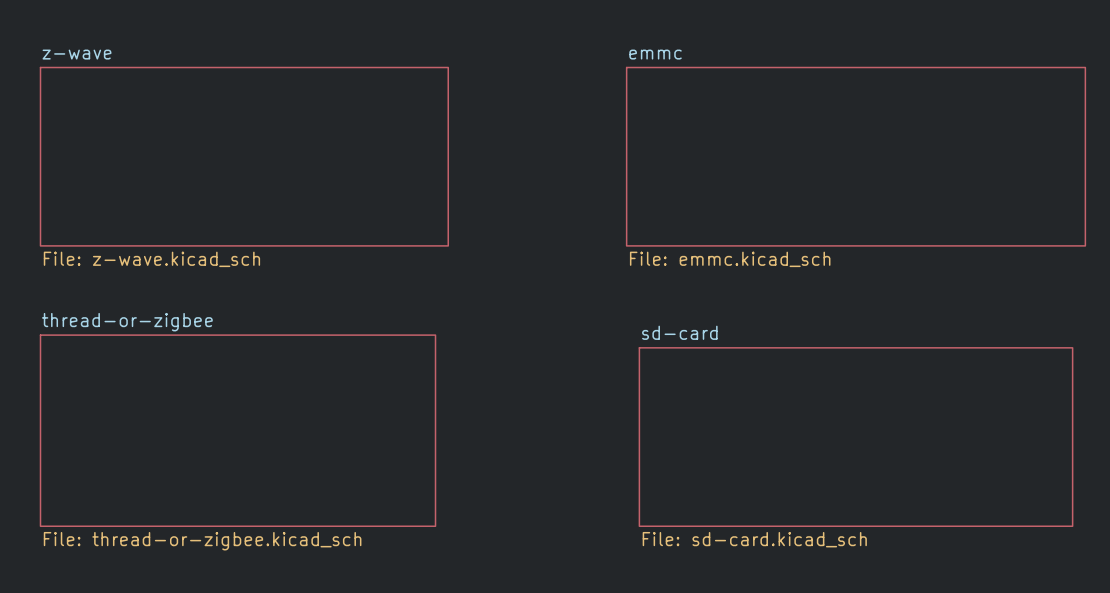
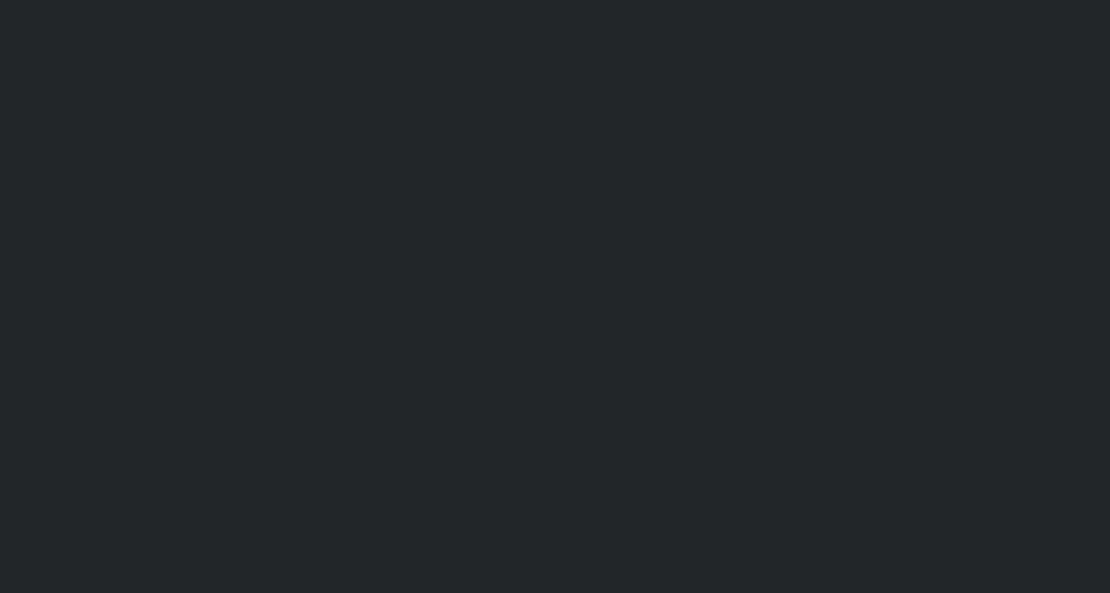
sheet z-wave: File: z-wave.kicad_sch (244, 156) -> none
sheet emmc: File: emmc.kicad_sch (856, 156) -> none
sheet thread-or-zigbee: File: thread-or-zigbee.kicad_sch (238, 430) -> none
sheet sd-card: File: sd-card.kicad_sch (856, 437) -> none

